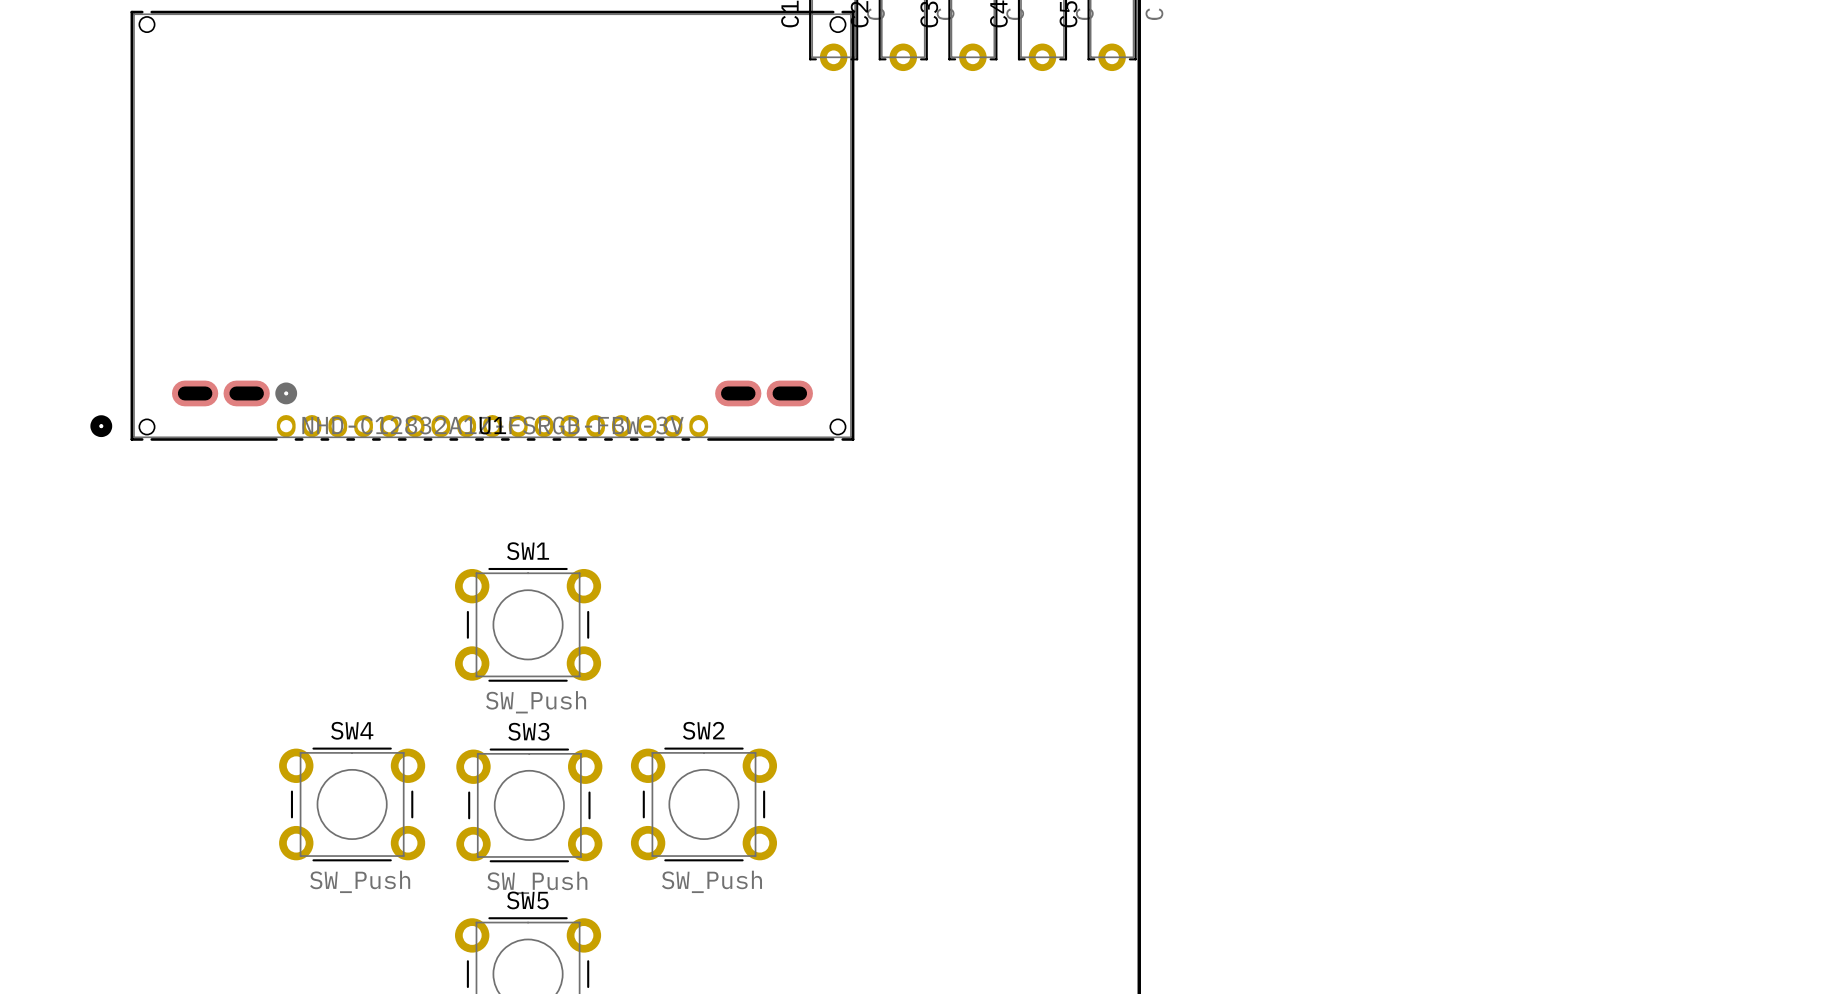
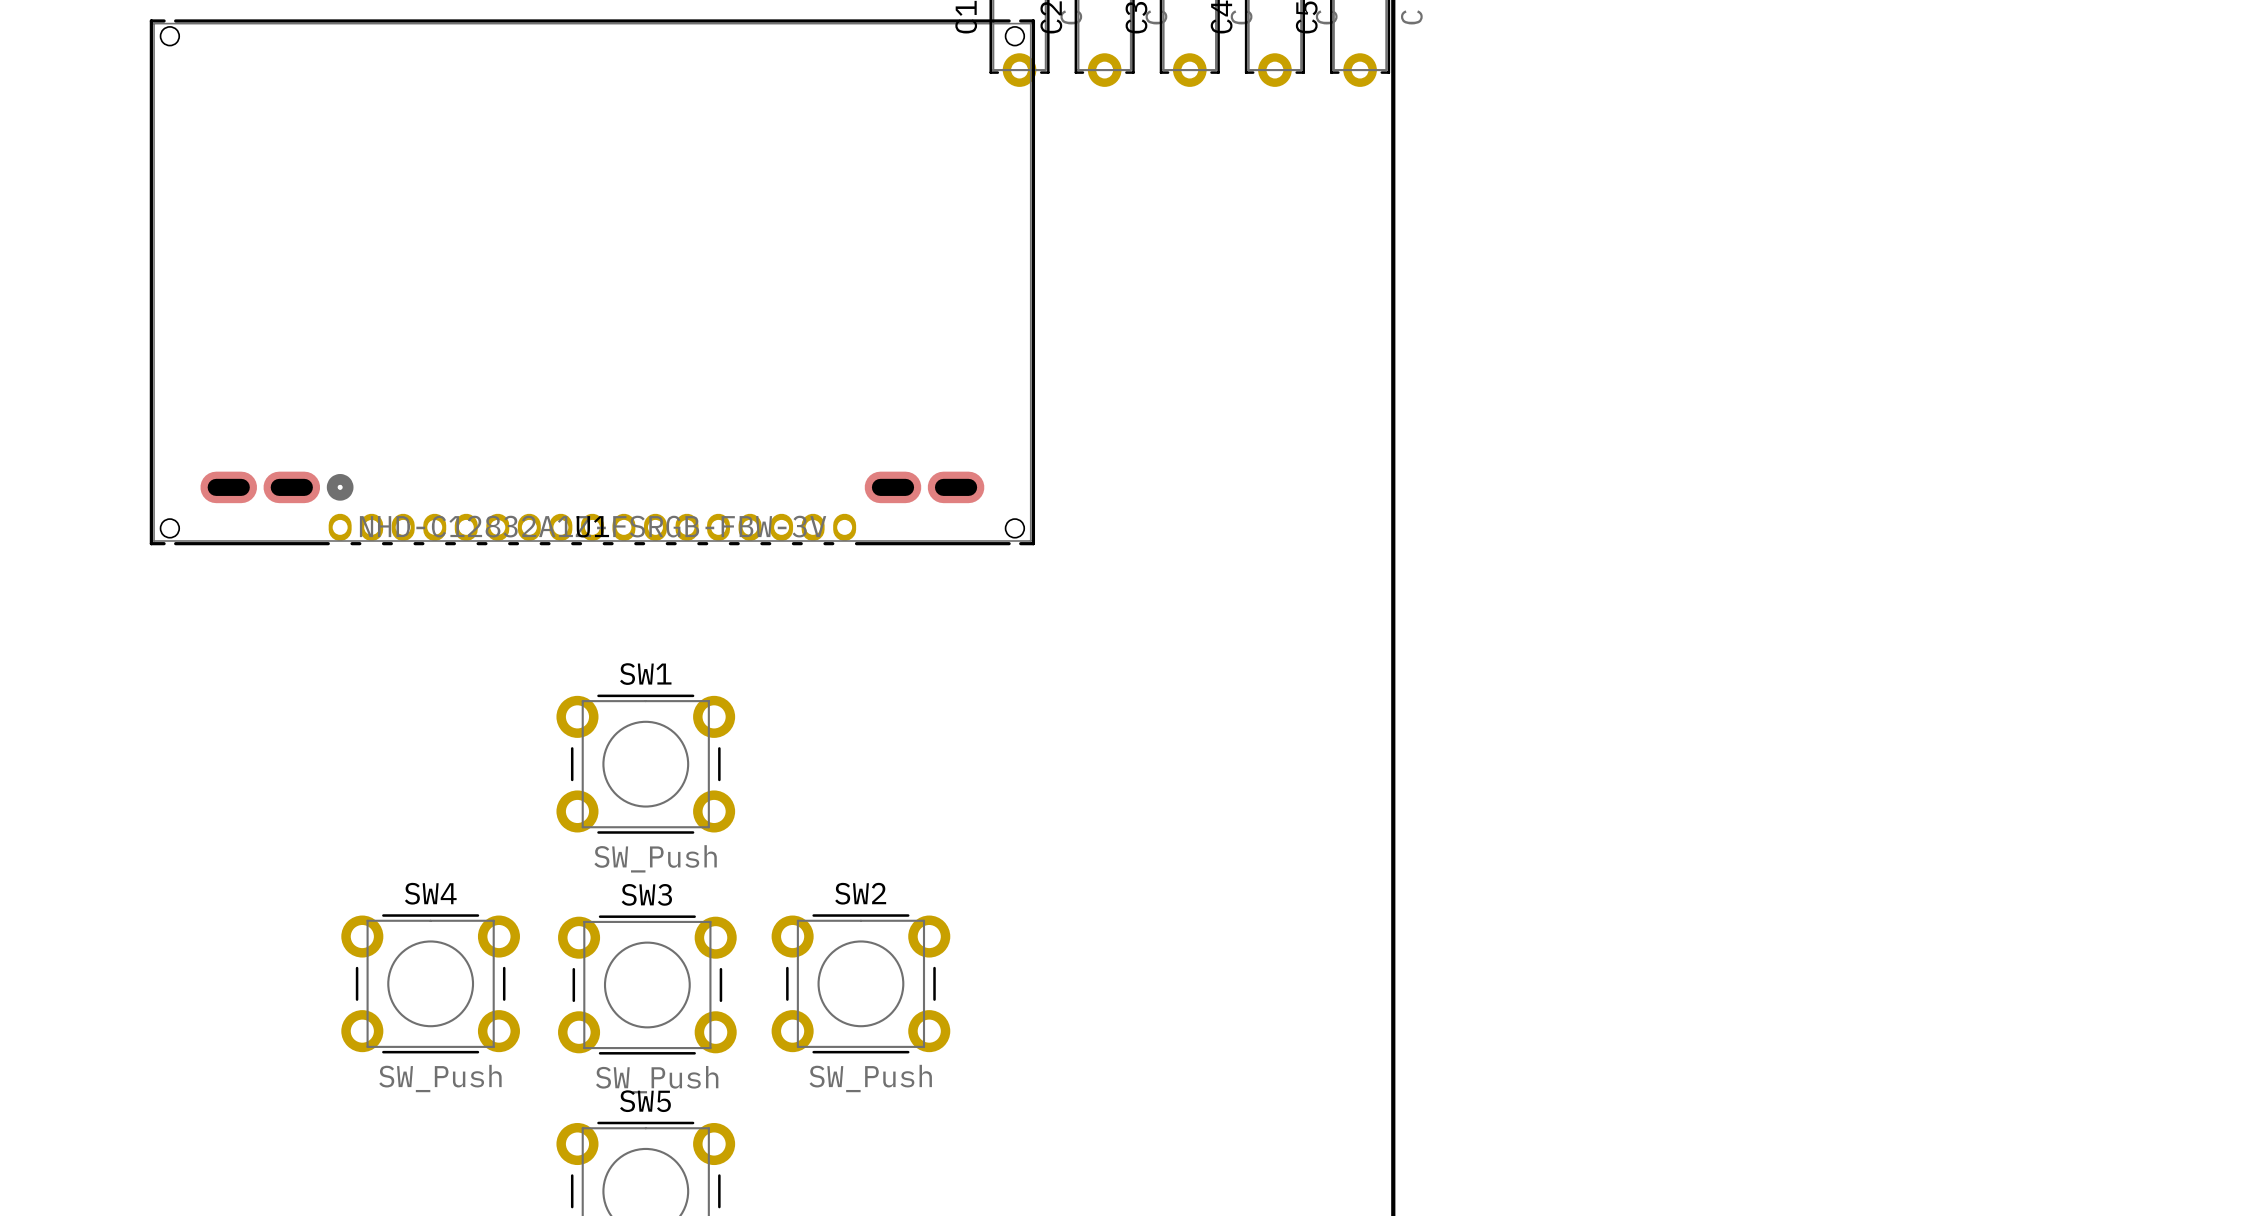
U1 footprint: [90, 10, 855, 441] -> [149, 19, 1036, 546]

